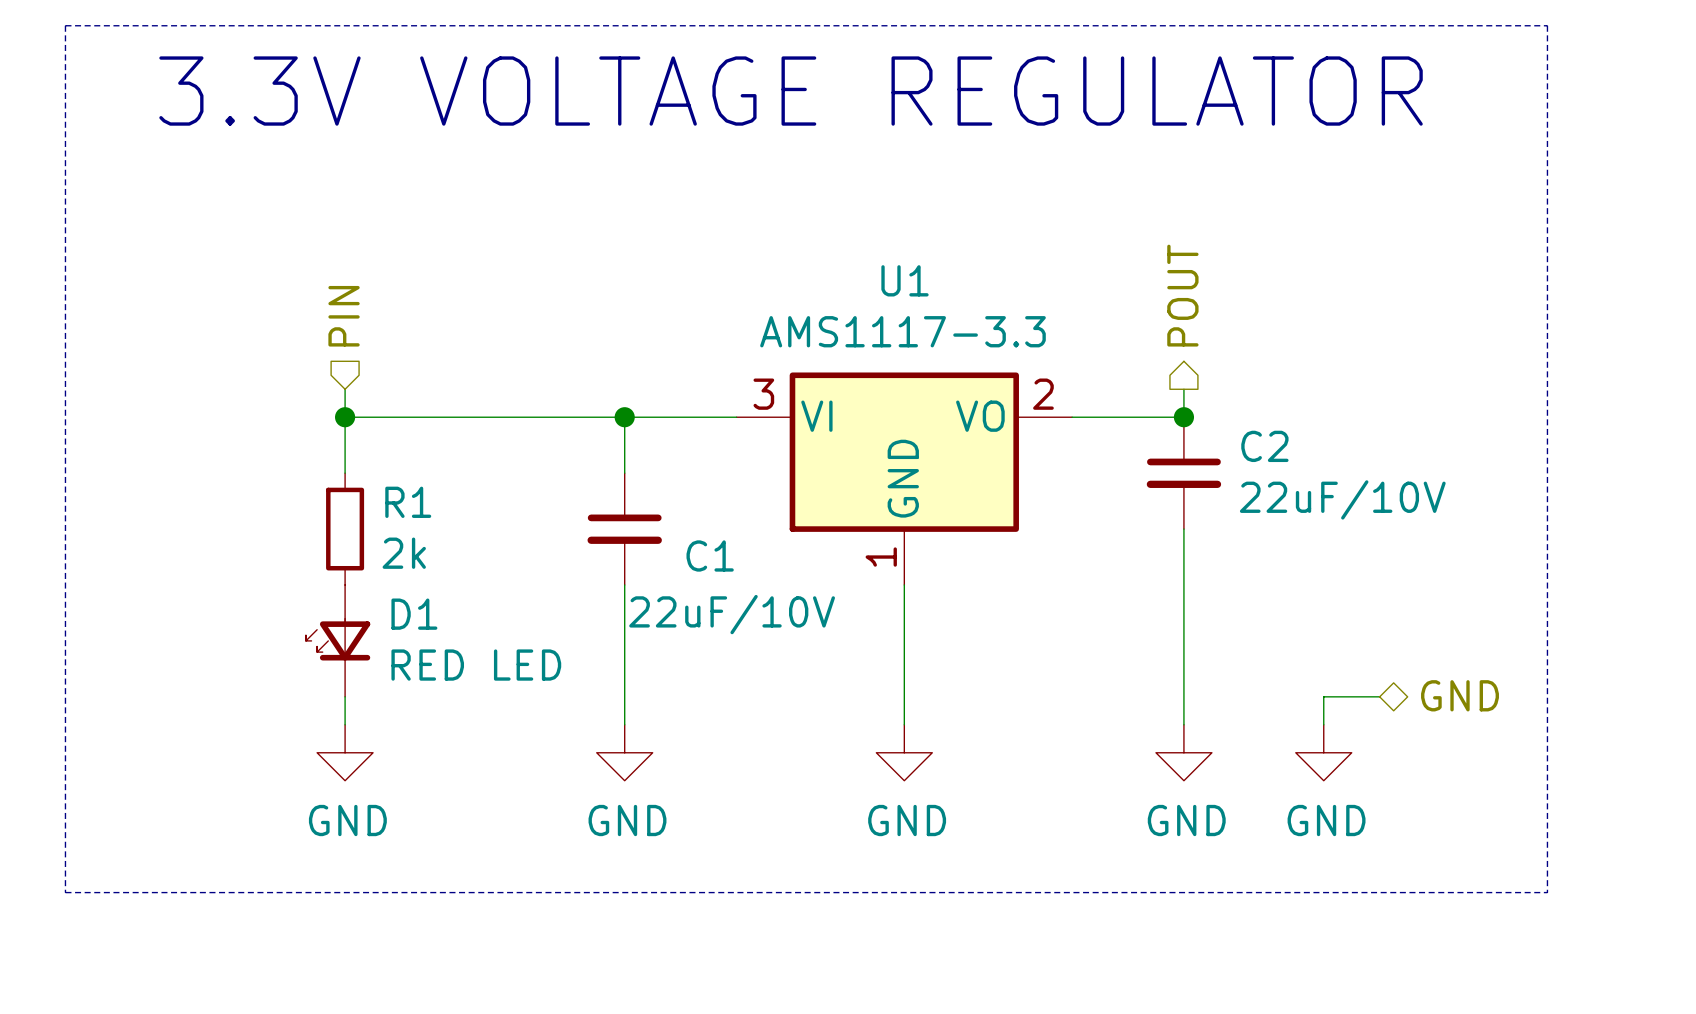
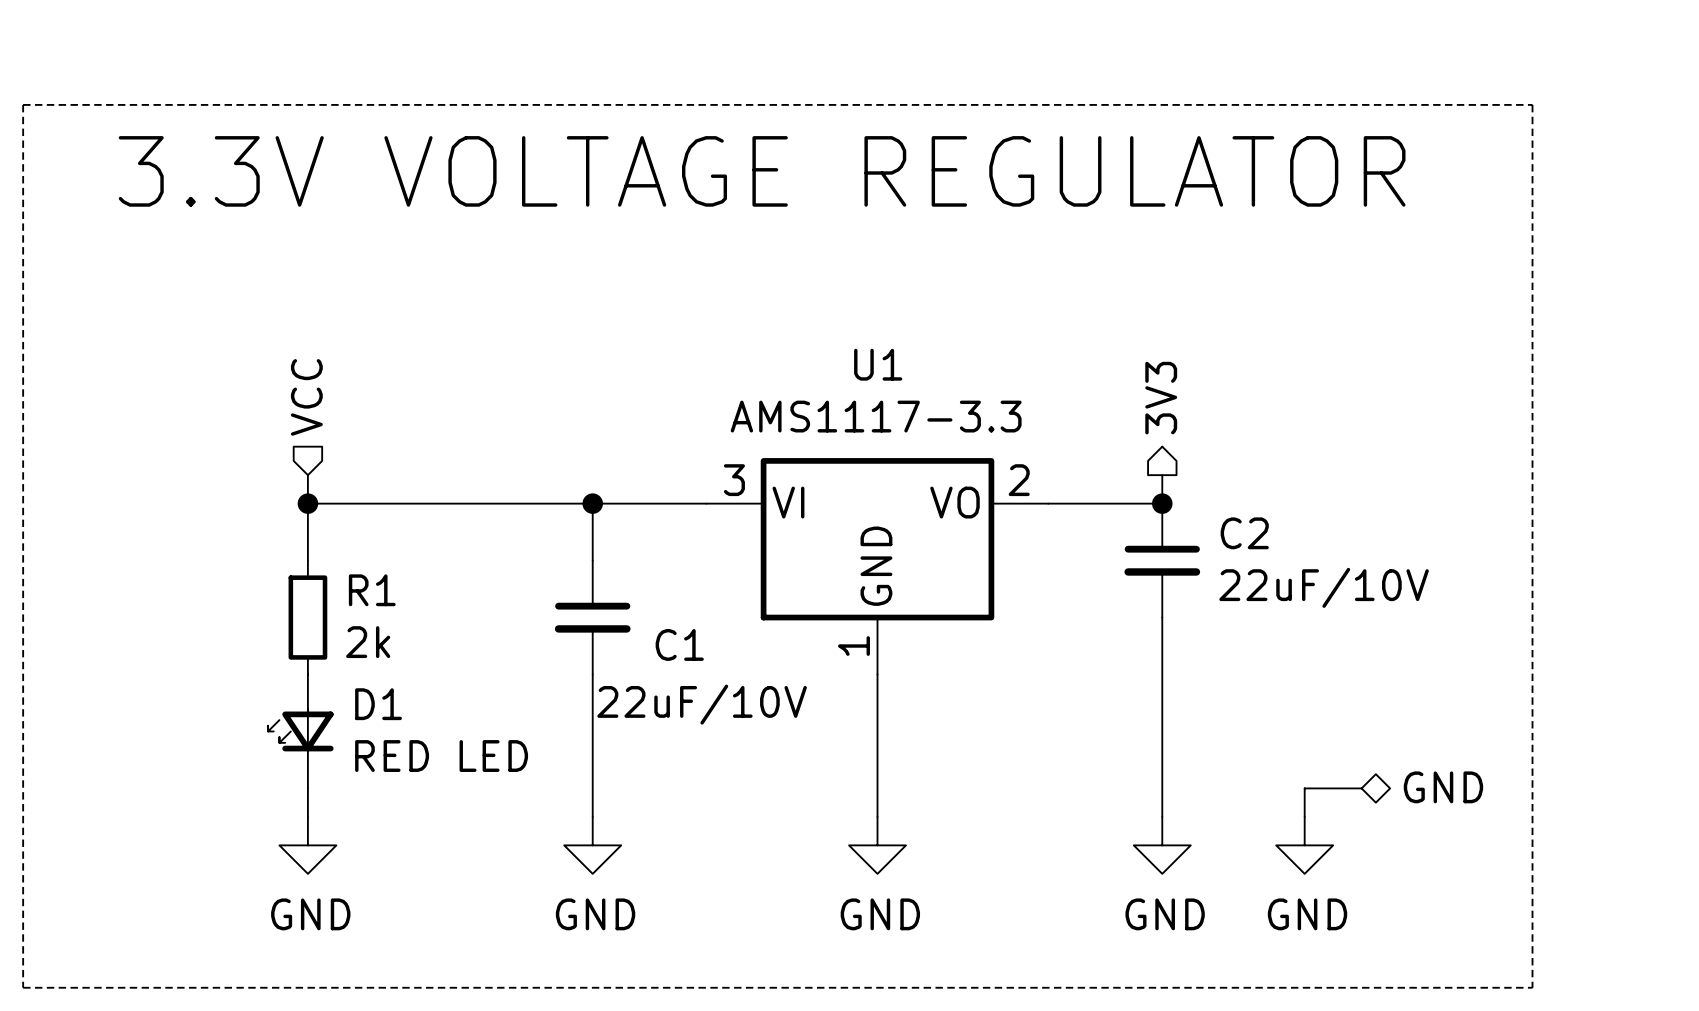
hierarchical label: POUT (1182, 295) -> 3V3 (1161, 398)
hierarchical label: PIN (344, 316) -> VCC (306, 397)

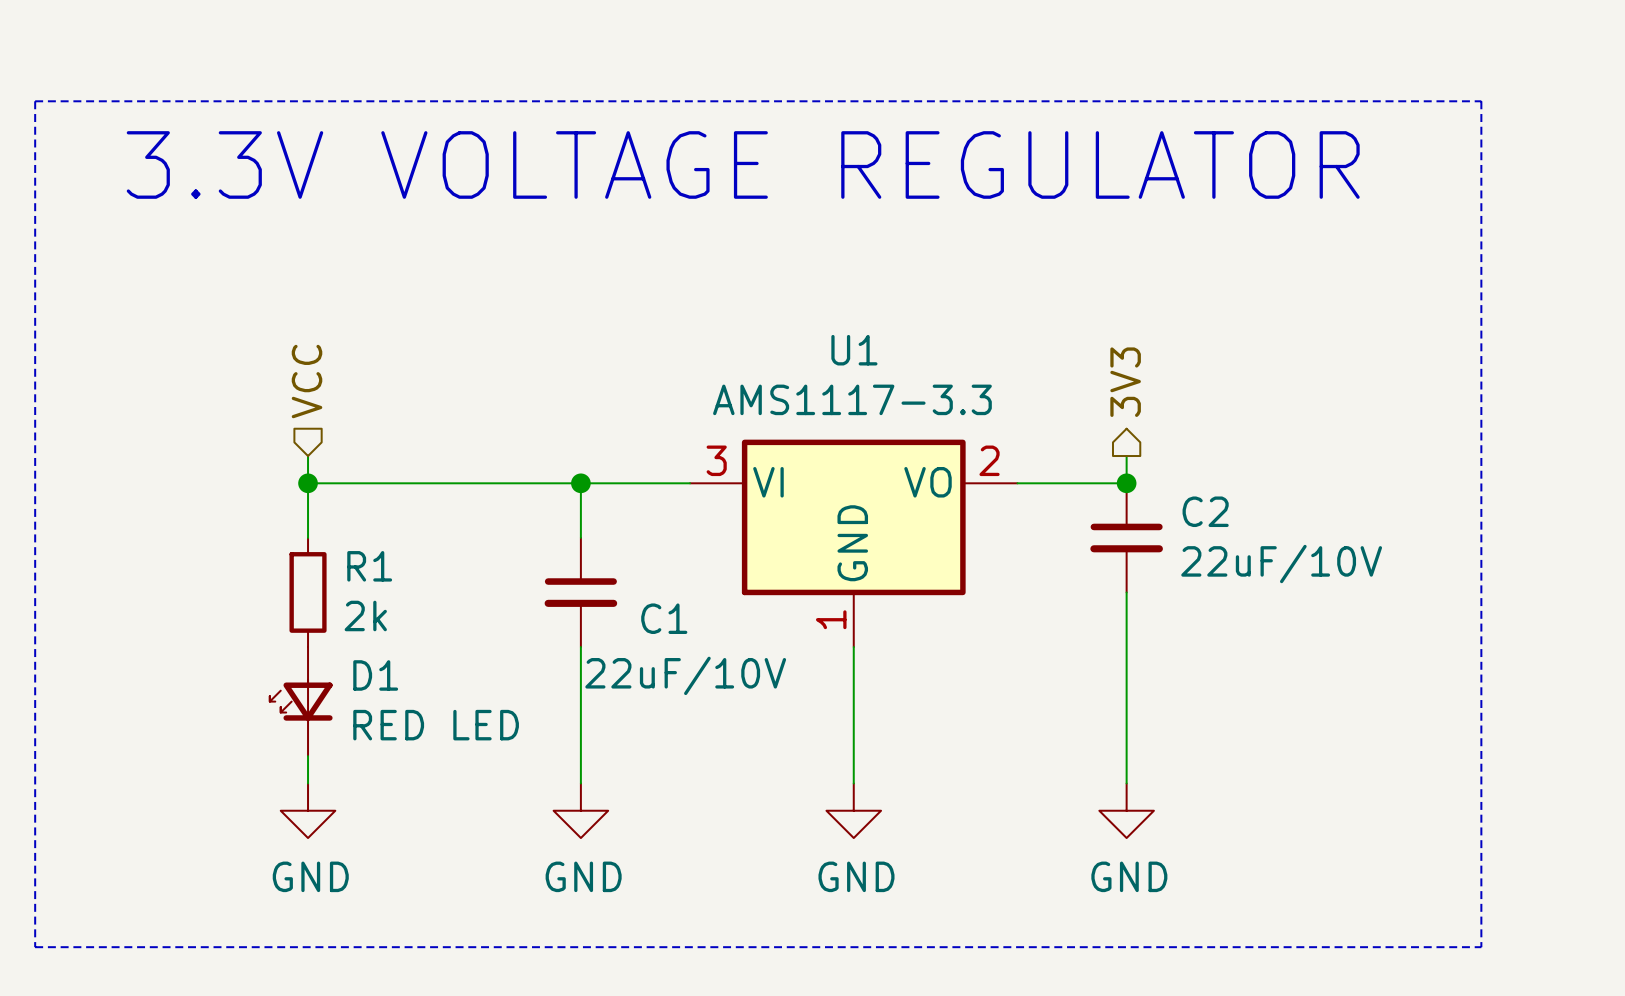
hierarchical label: GND (1443, 787) -> none
wire: (1361, 788) (1304, 788) (1304, 816) -> none
power symbol: GND (1304, 845) -> none

